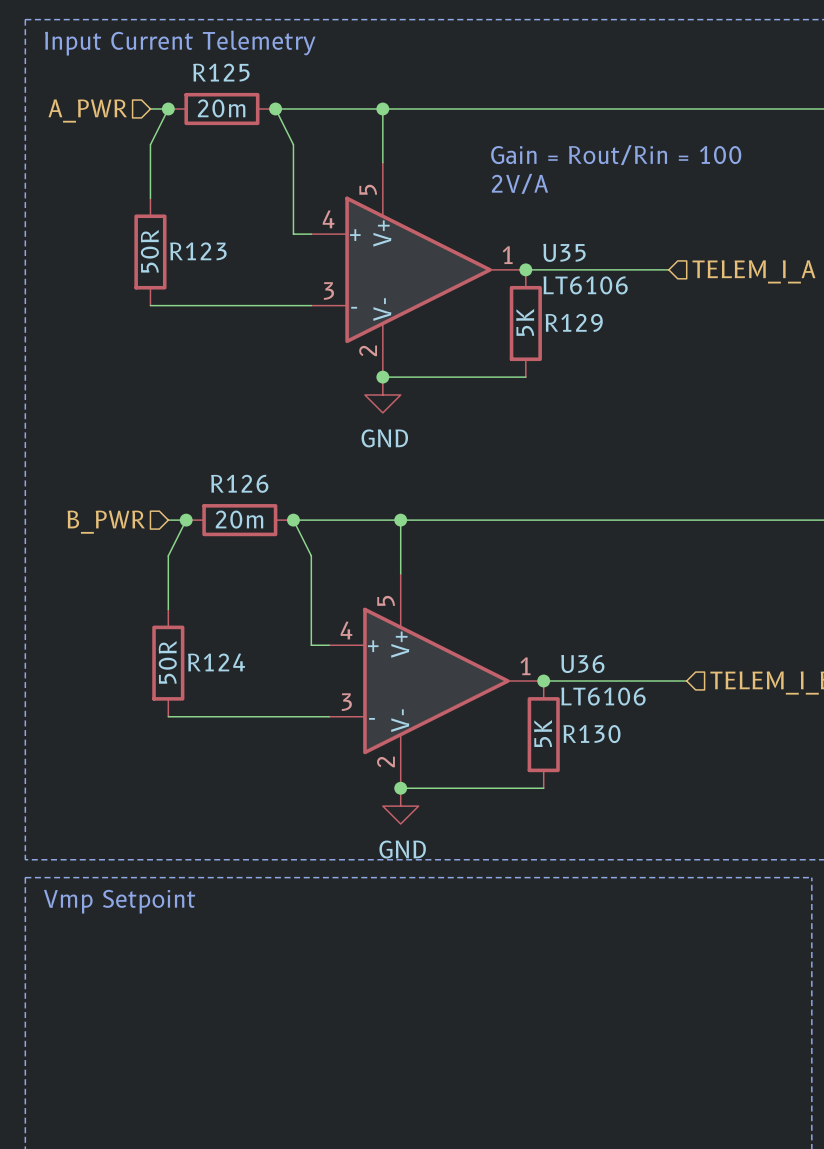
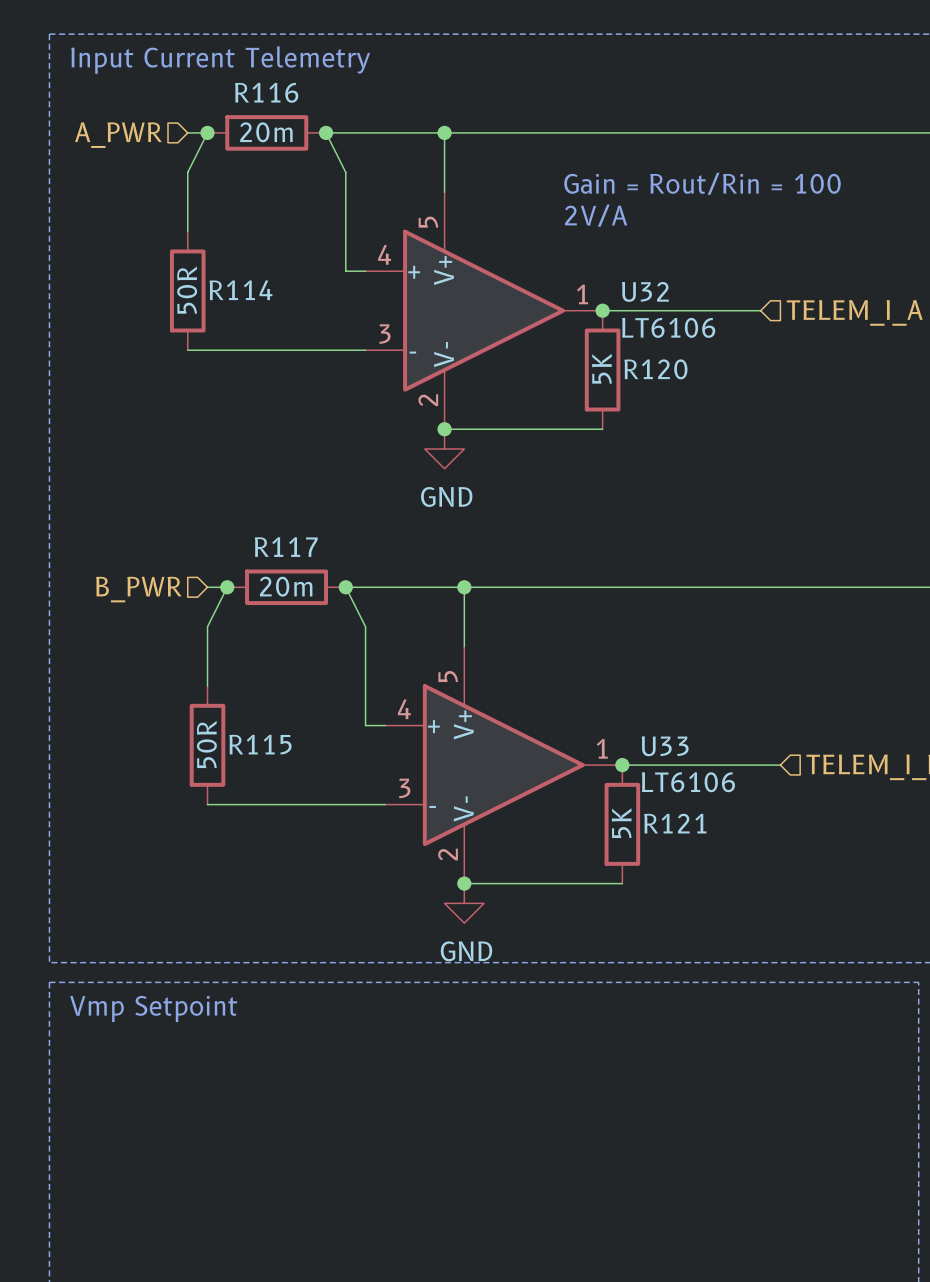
R125 name: R125 (221, 72) -> R116 (266, 92)
R123 name: R123 (198, 251) -> R114 (241, 290)
U35 name: U35 (564, 252) -> U32 (645, 291)
R129 name: R129 (574, 322) -> R120 (655, 369)
R126 name: R126 (239, 483) -> R117 (286, 547)
R124 name: R124 (216, 662) -> R115 (260, 744)
U36 name: U36 (582, 663) -> U33 (665, 746)
R130 name: R130 (591, 734) -> R121 (675, 823)

